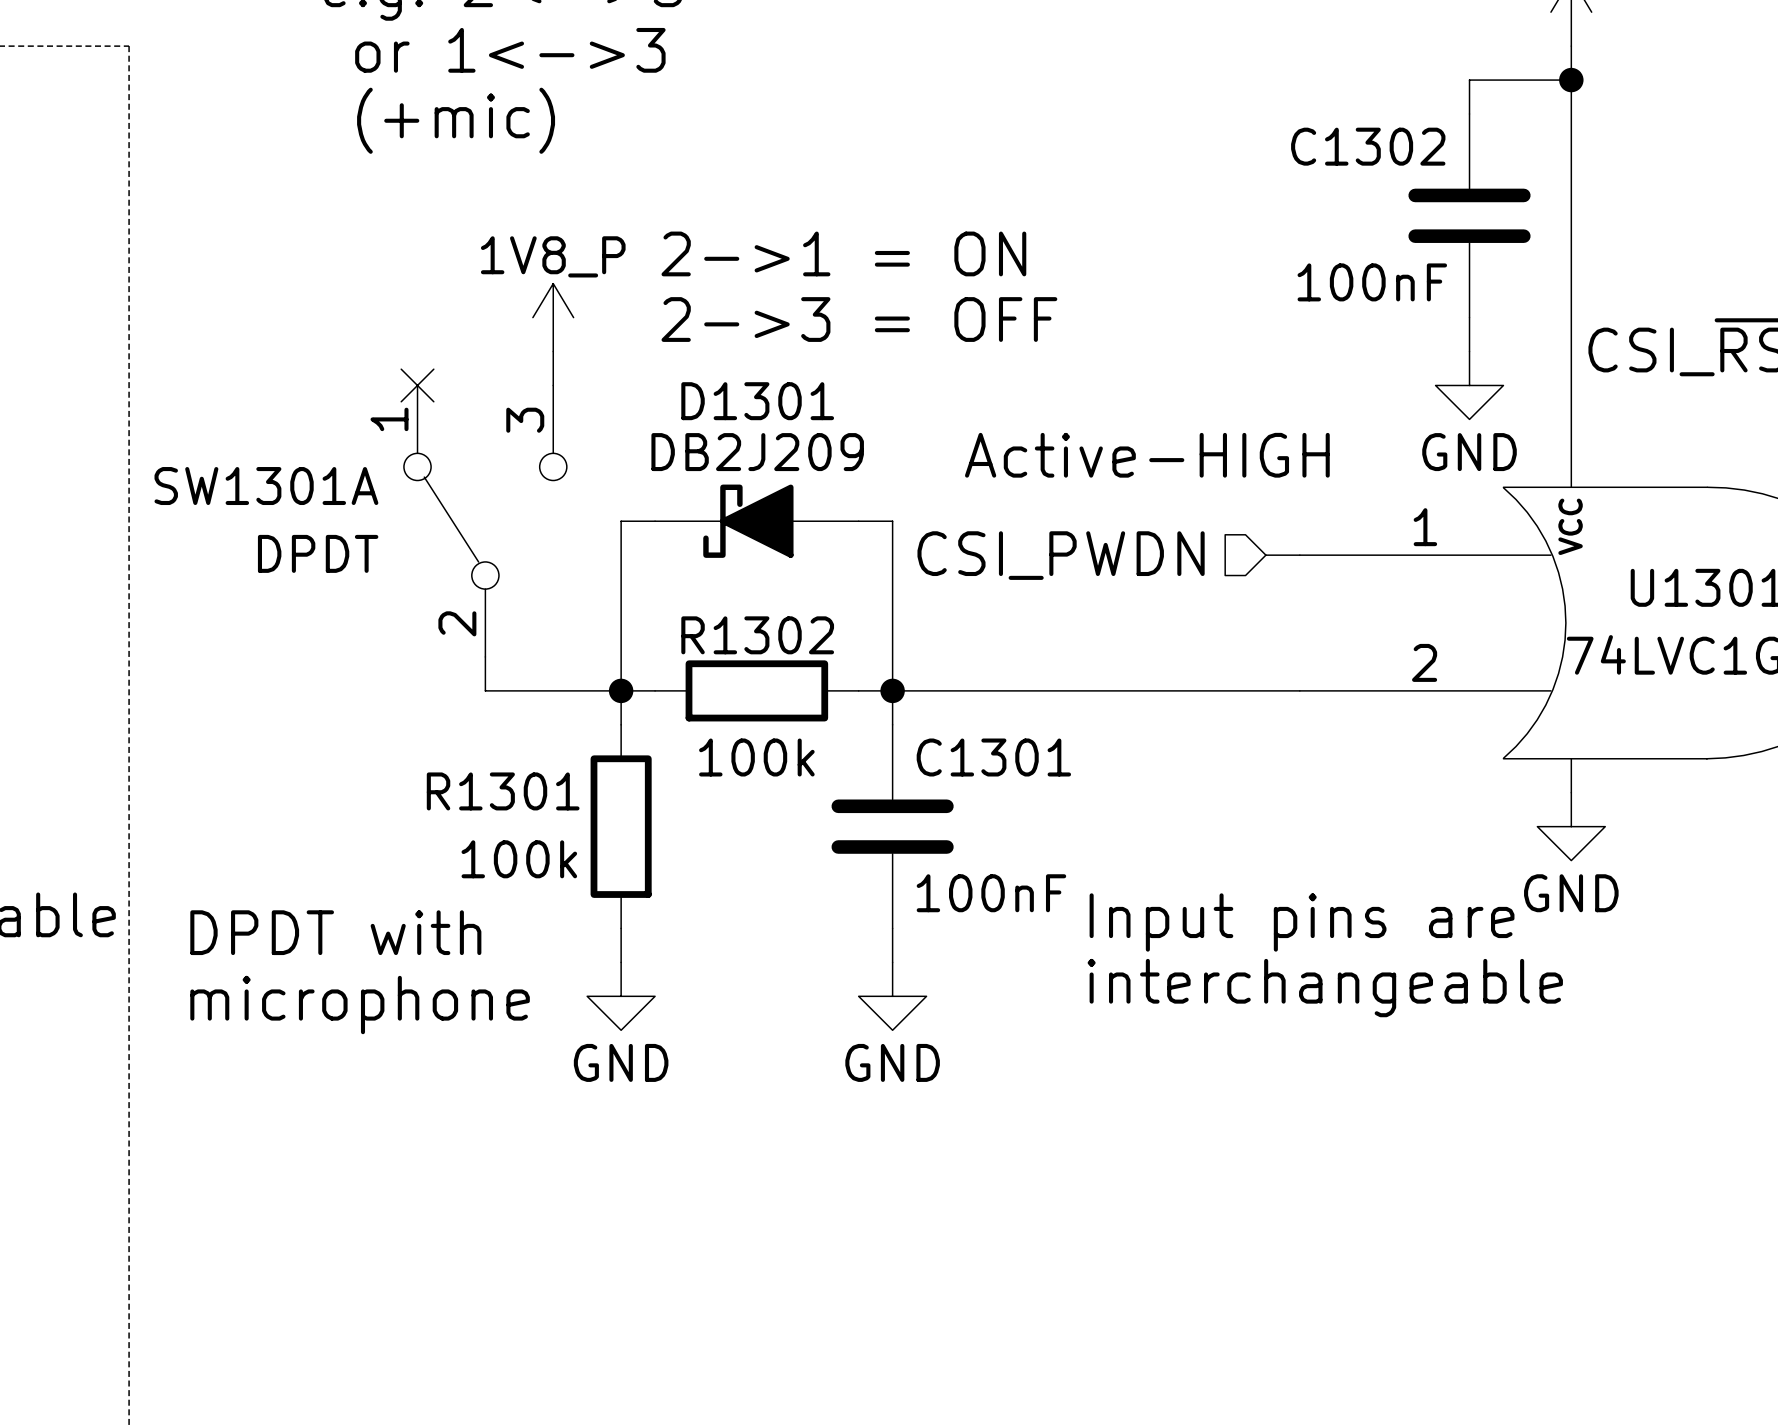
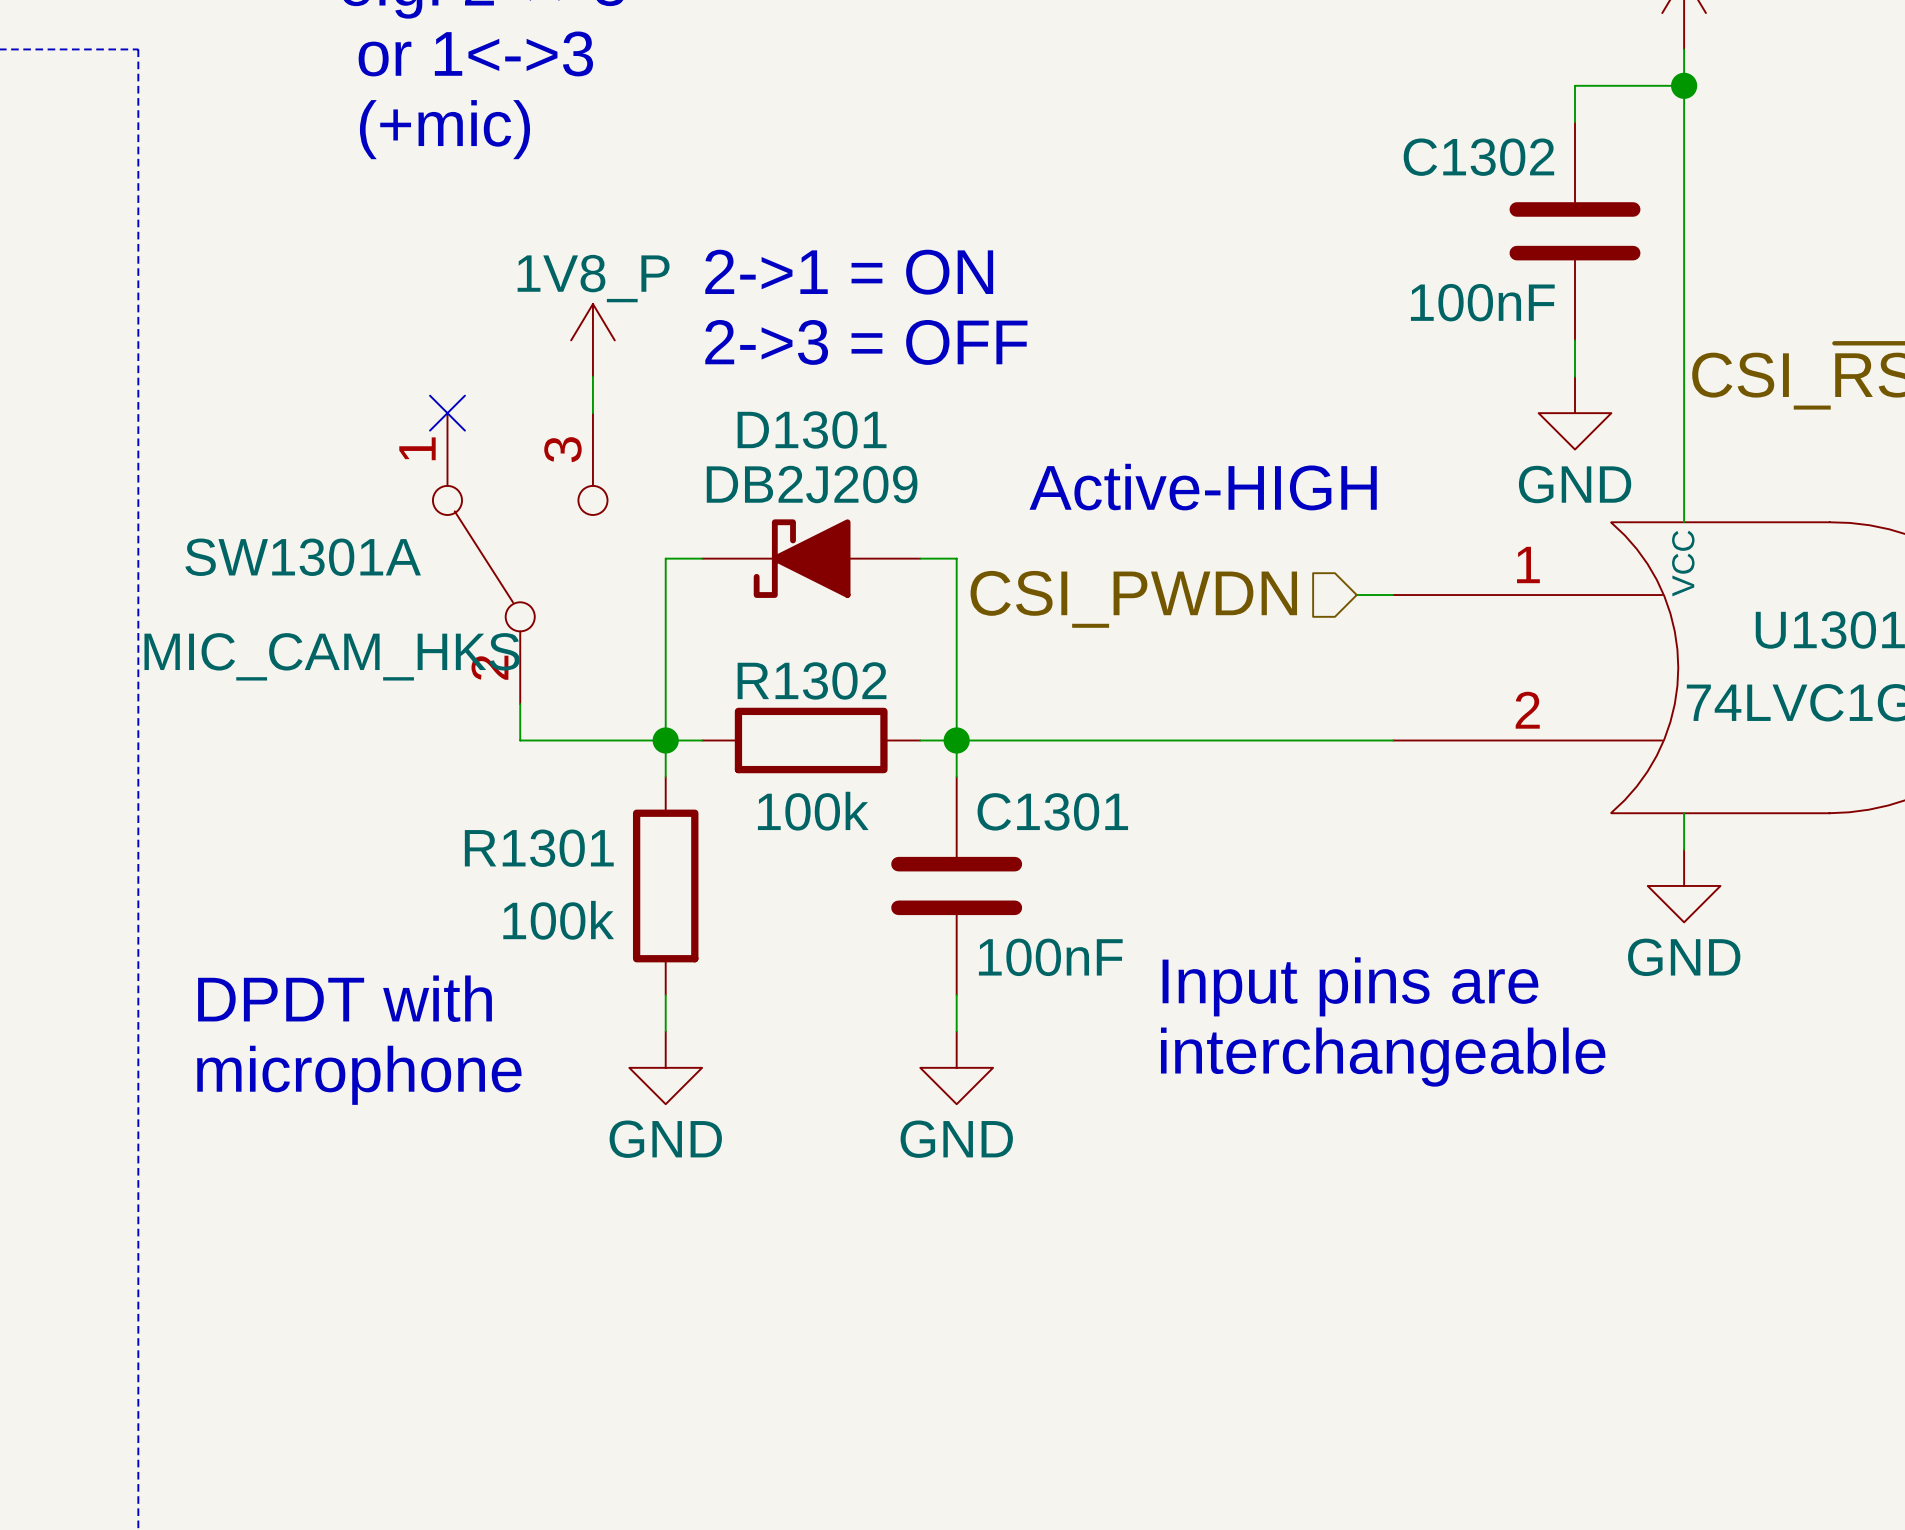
SW1301A name position: SW1301A (266, 486) -> SW1301A (303, 557)
SW1301A value: DPDT (318, 553) -> MIC_CAM_HKS (332, 656)

